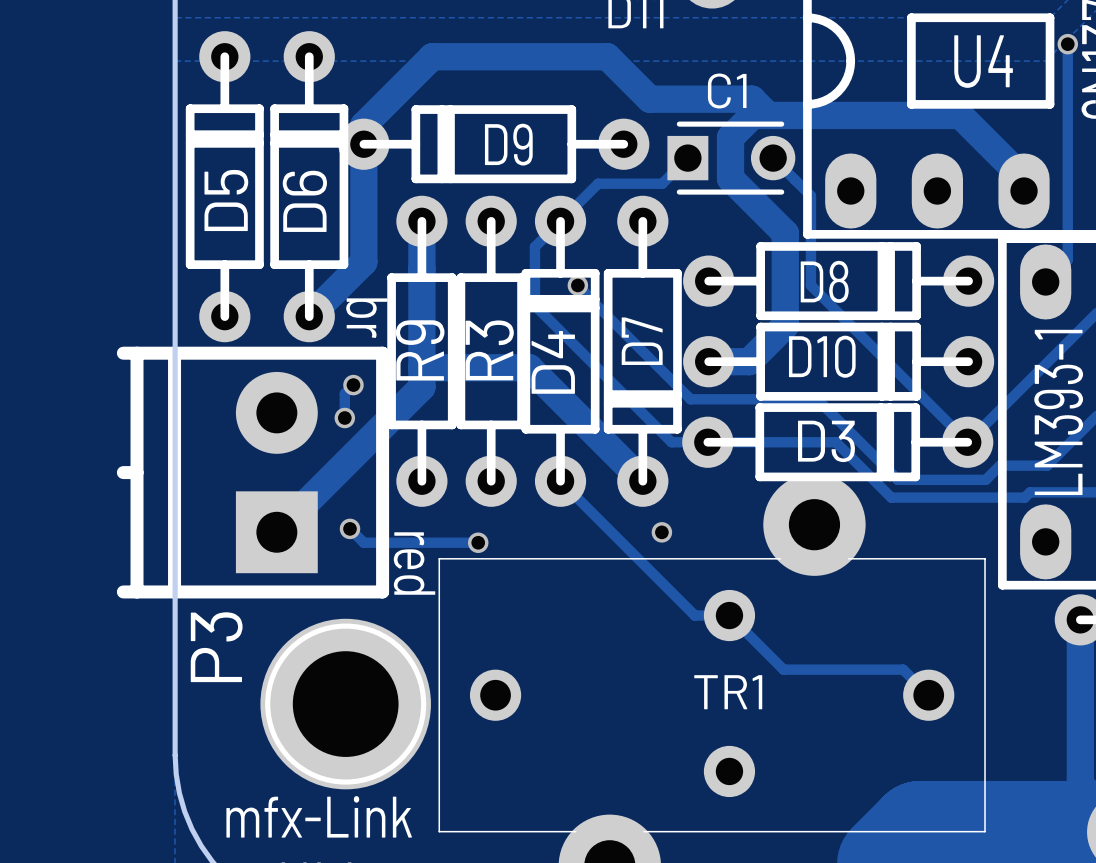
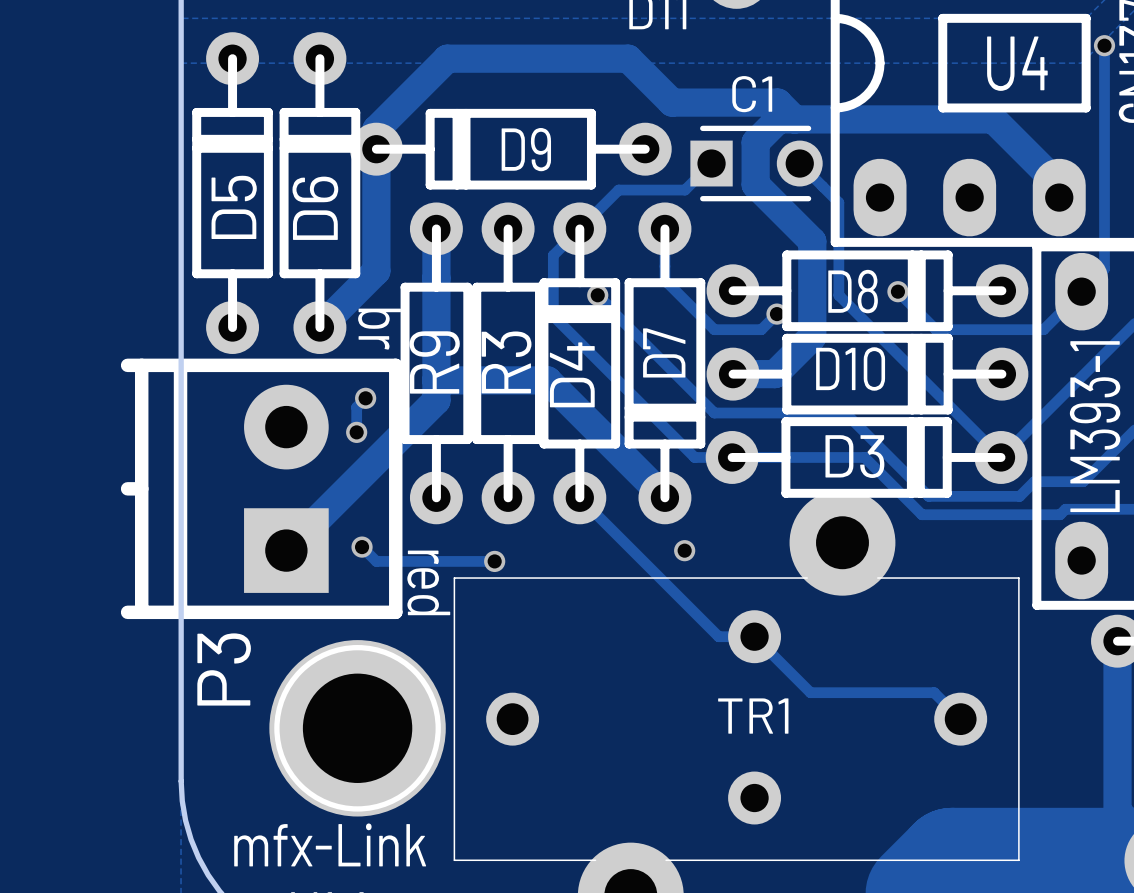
track: none -> (664, 228) (664, 280) (714, 329) (761, 329) (776, 314)
track: none -> (897, 291) (935, 329) (1043, 329) (1081, 291)
via: none -> (897, 291)
via: none -> (776, 314)

